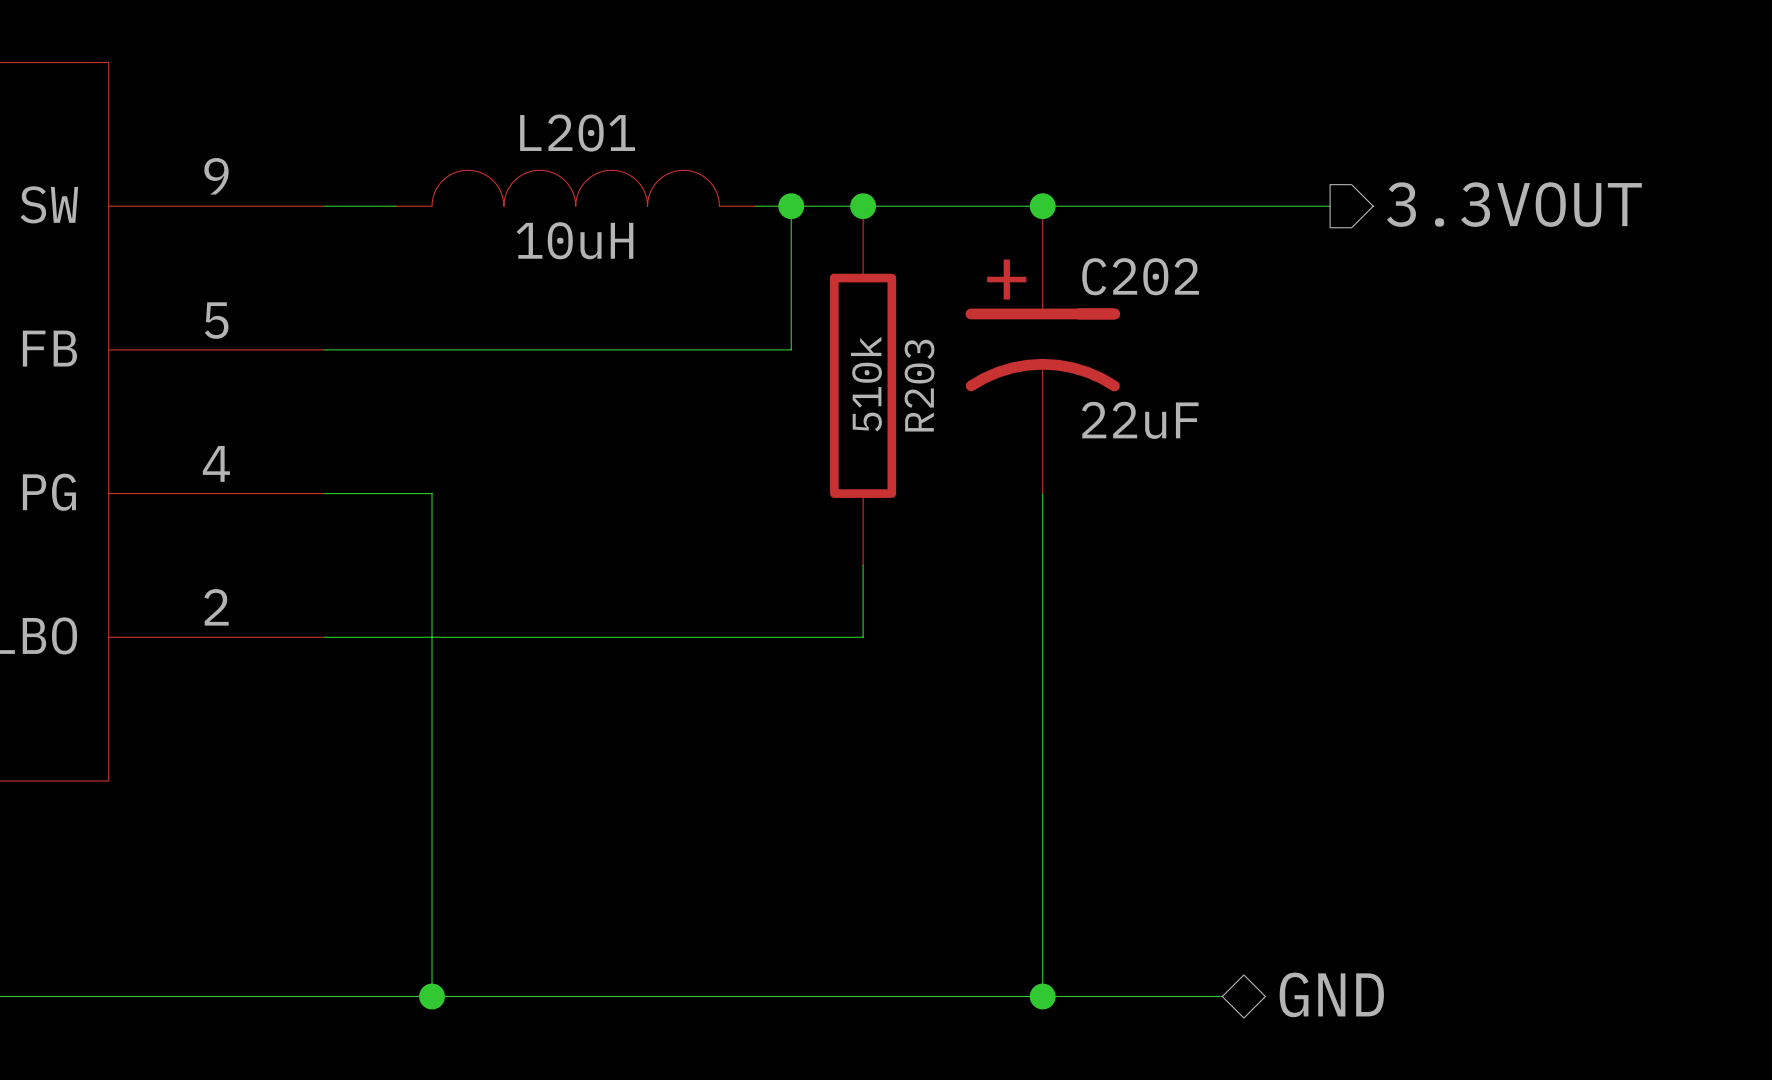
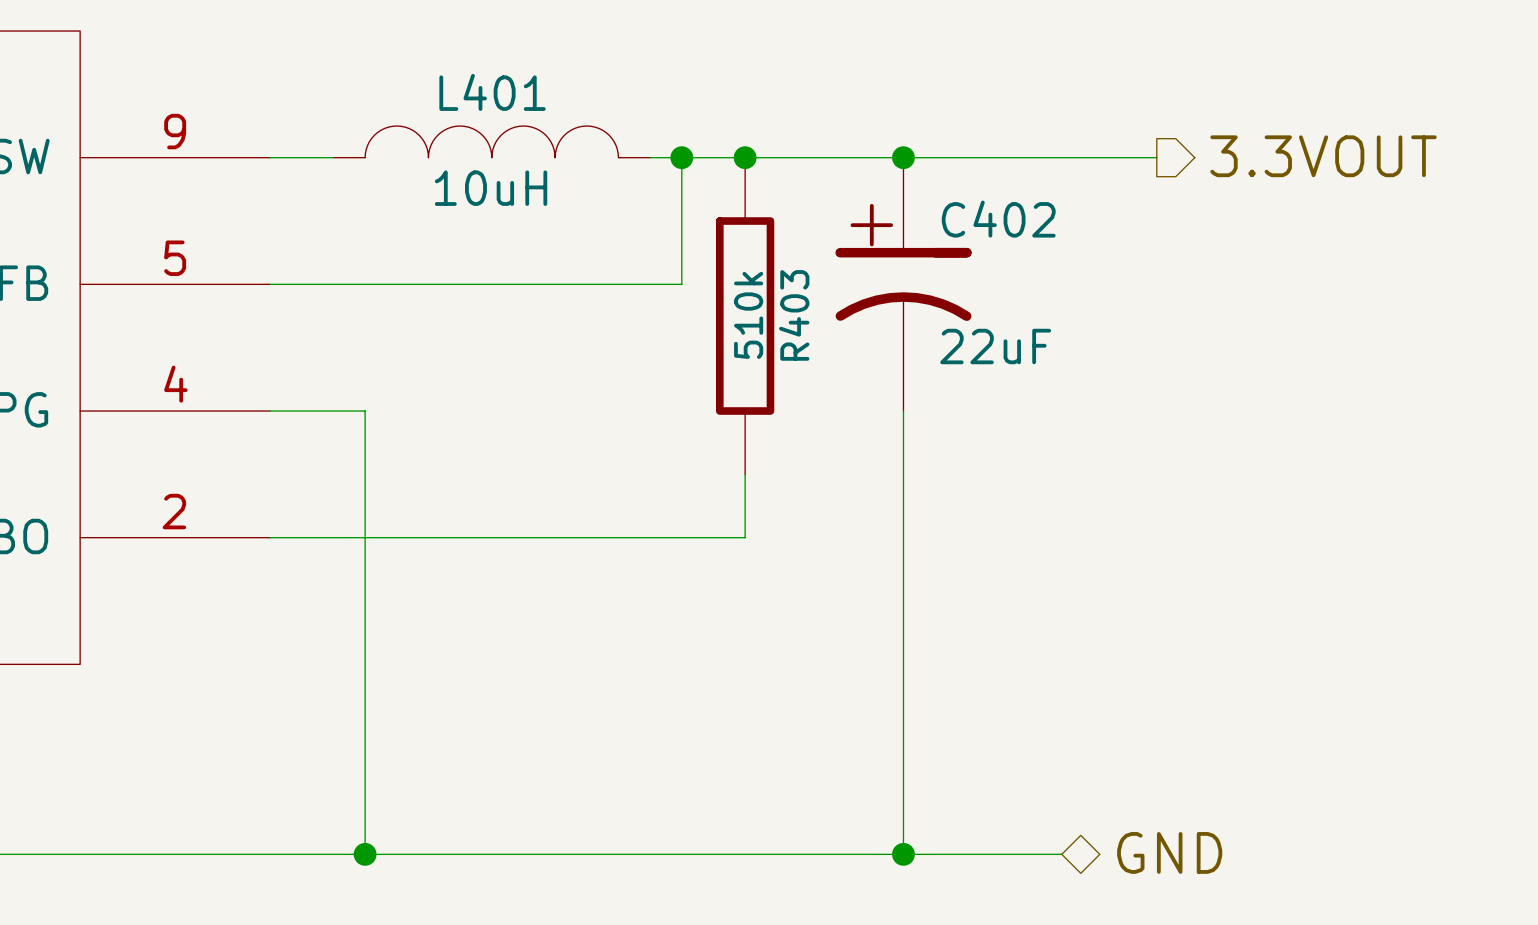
L201 name: L201 (577, 133) -> L401 (492, 92)
C202 name: C202 (1140, 276) -> C402 (998, 219)
R203 name: R203 (919, 385) -> R403 (794, 315)

